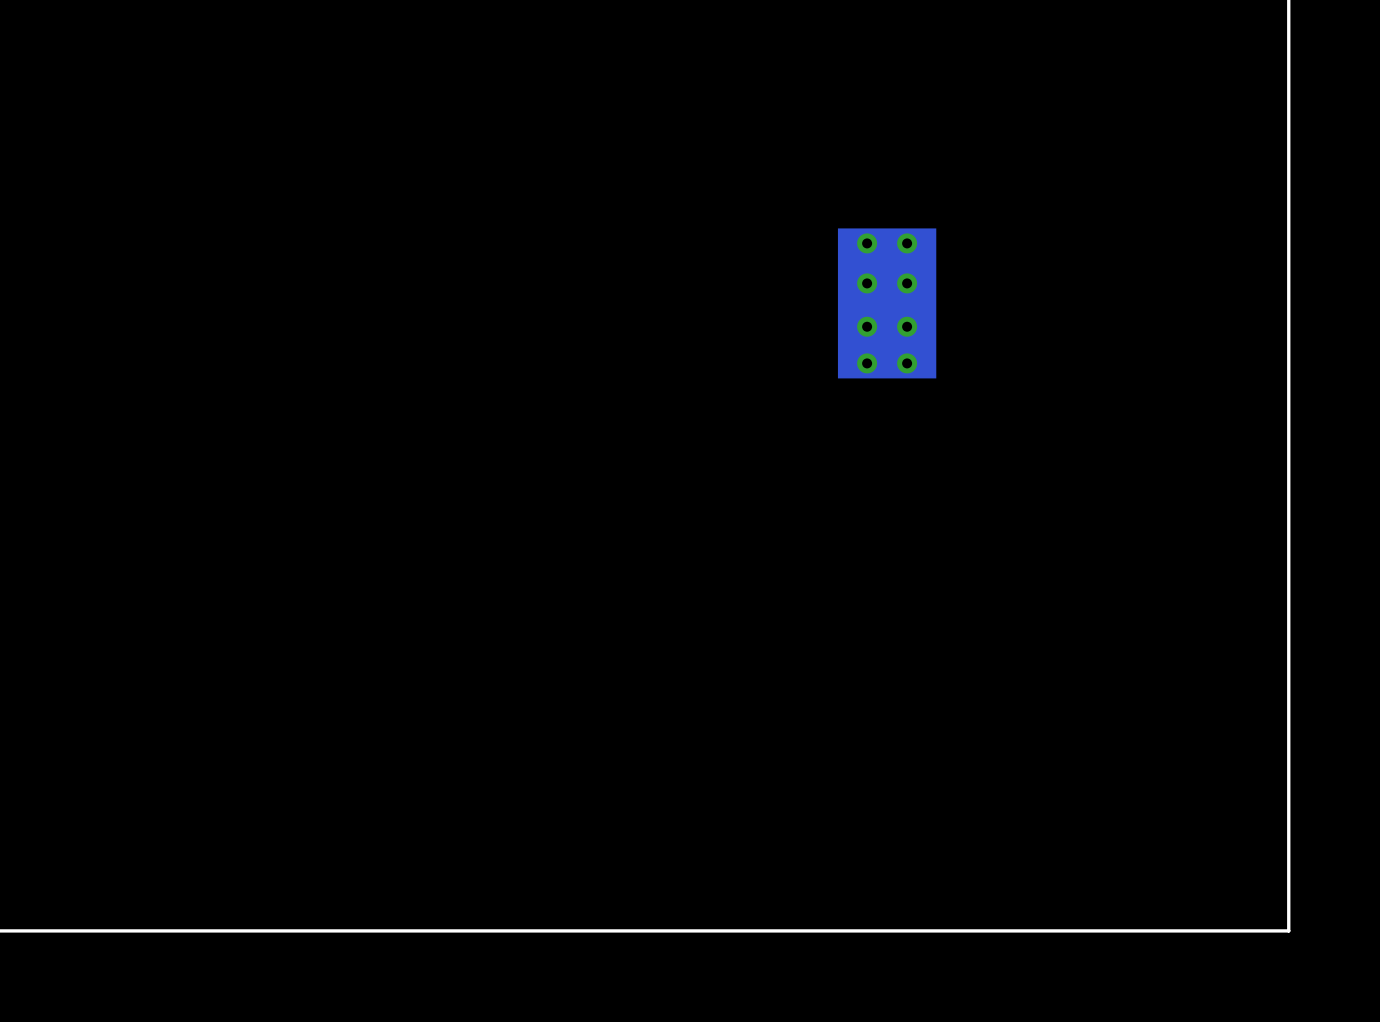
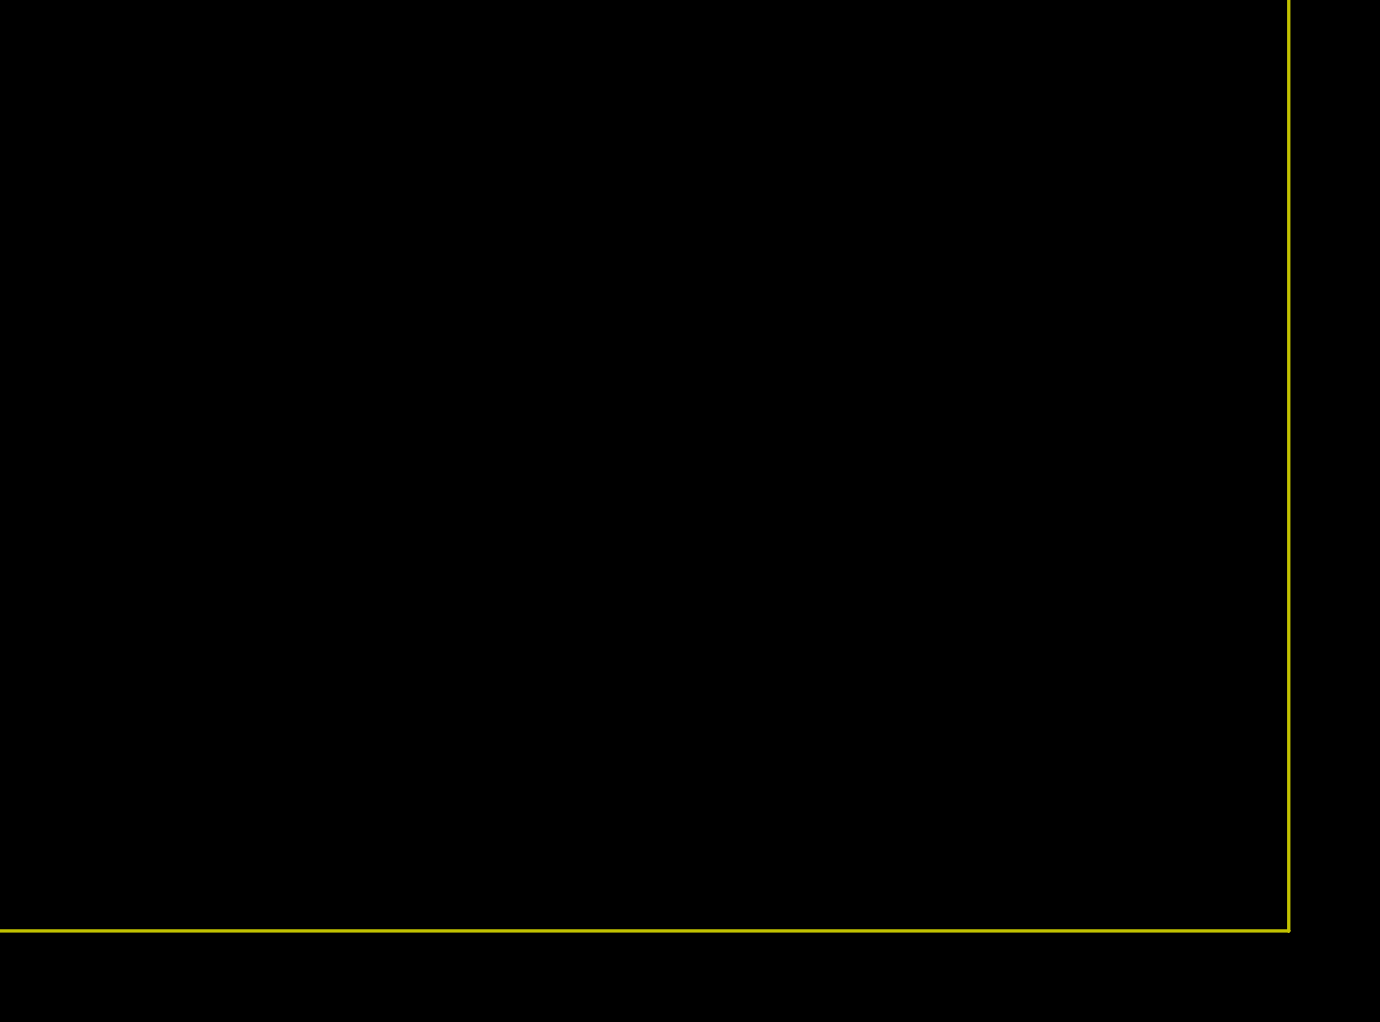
part: (887, 303) -> none

